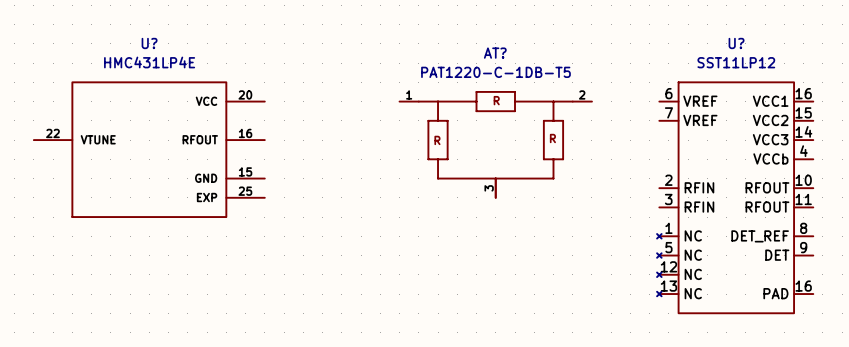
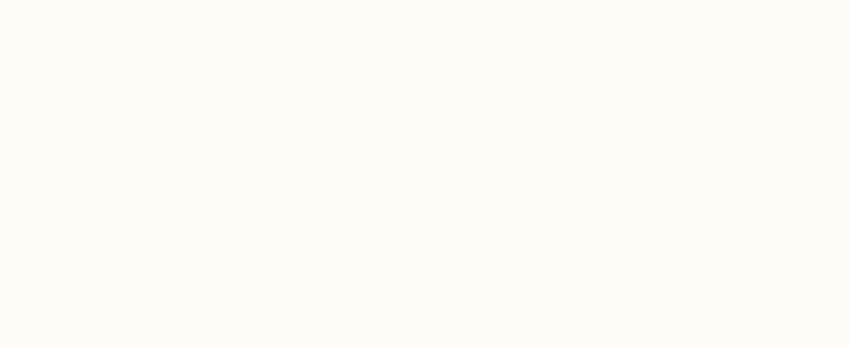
AT?: PAT1220-C-1DB-T5 (495, 144) -> none
U?: HMC431LP4E (149, 149) -> none
U?: SST11LP12 (735, 197) -> none

